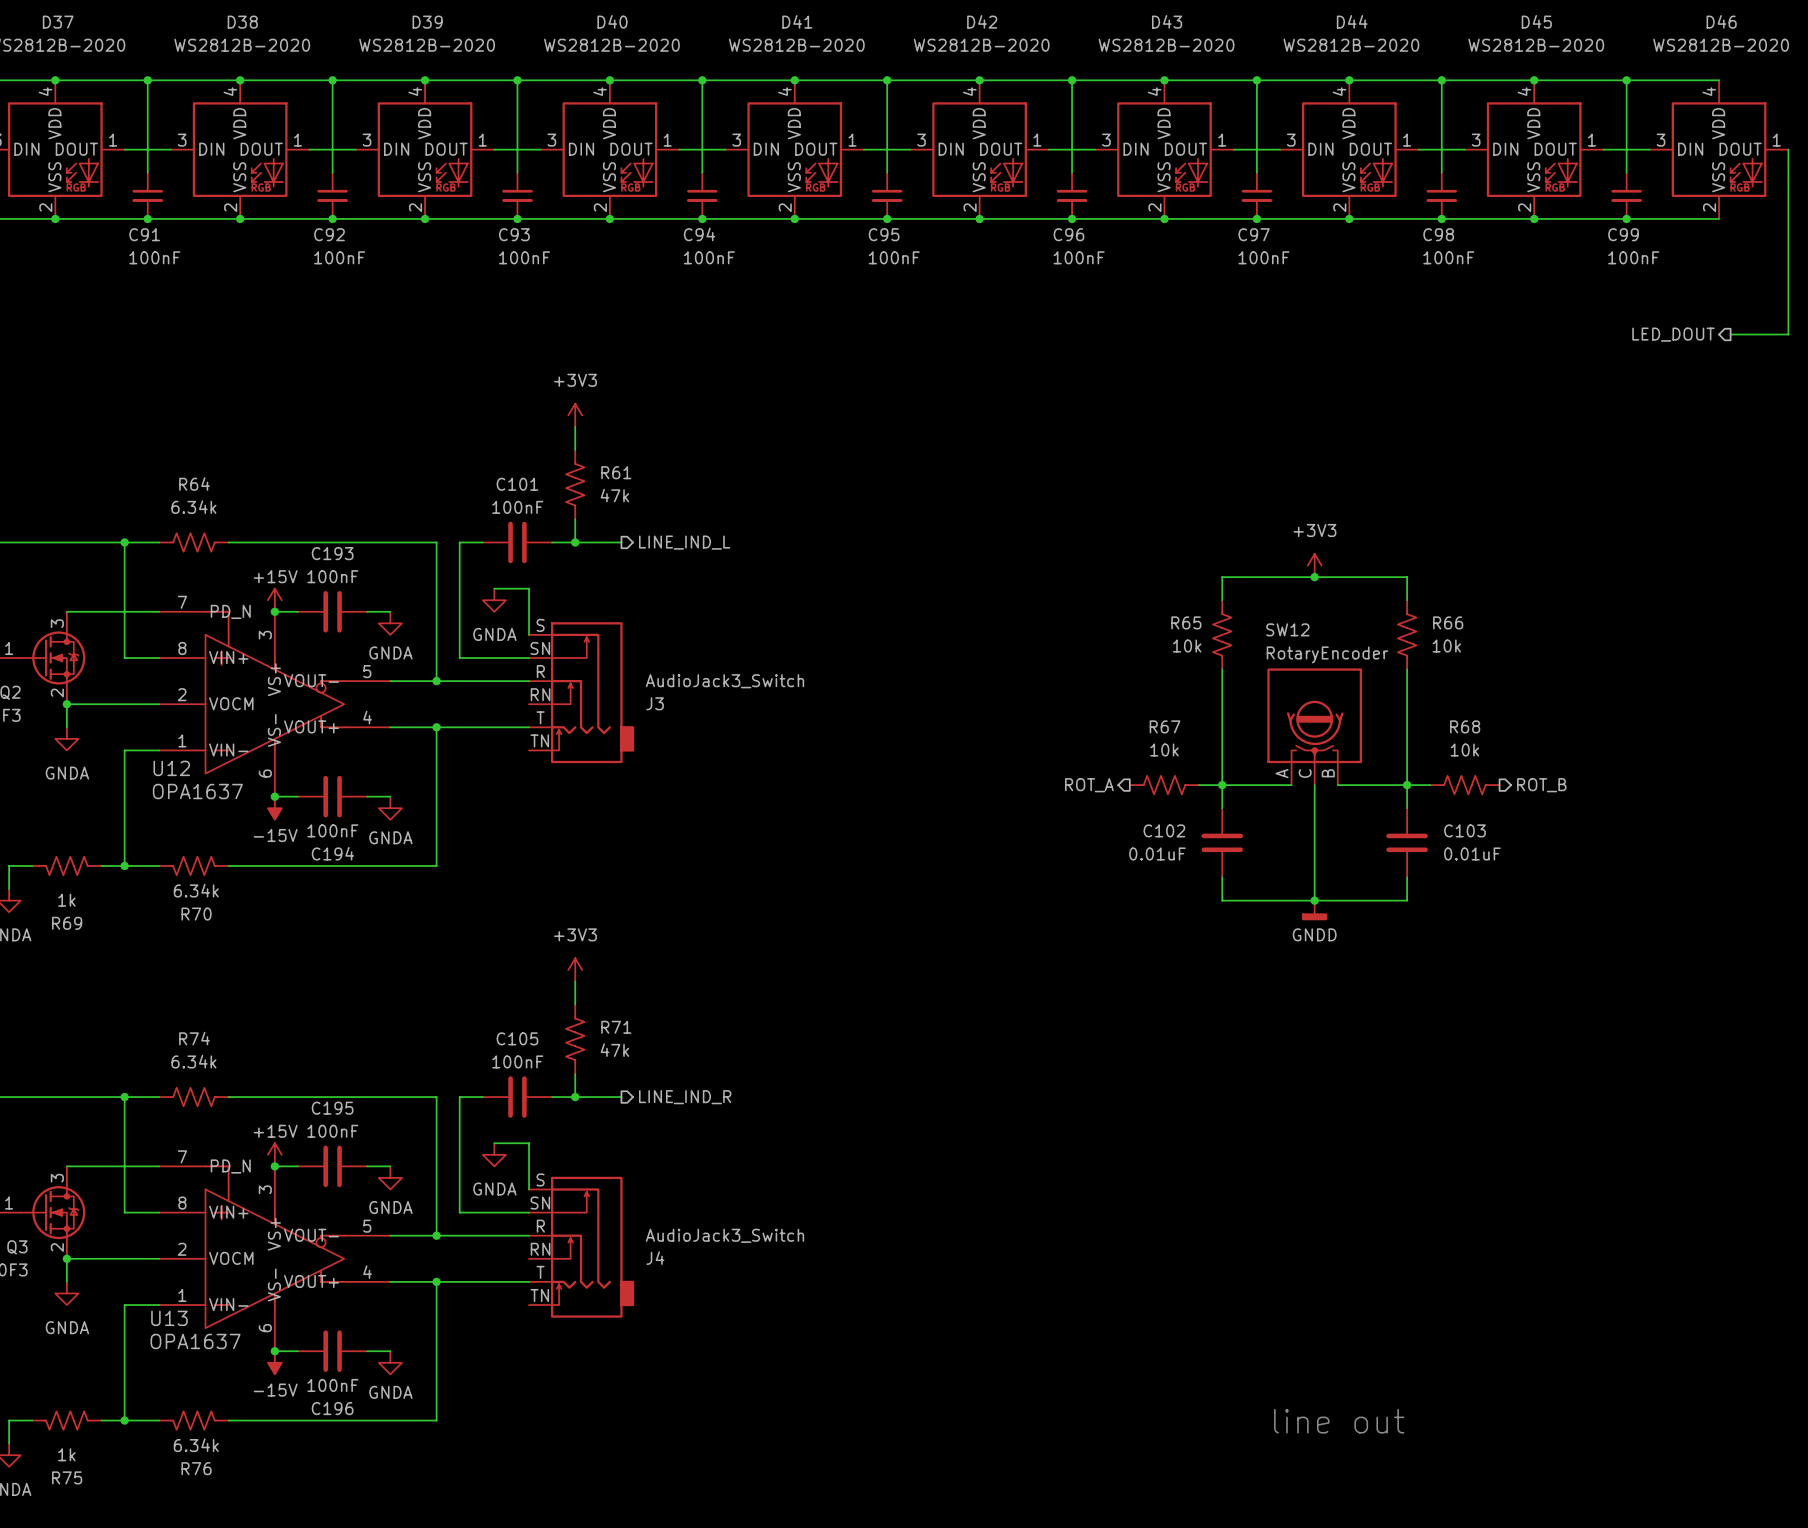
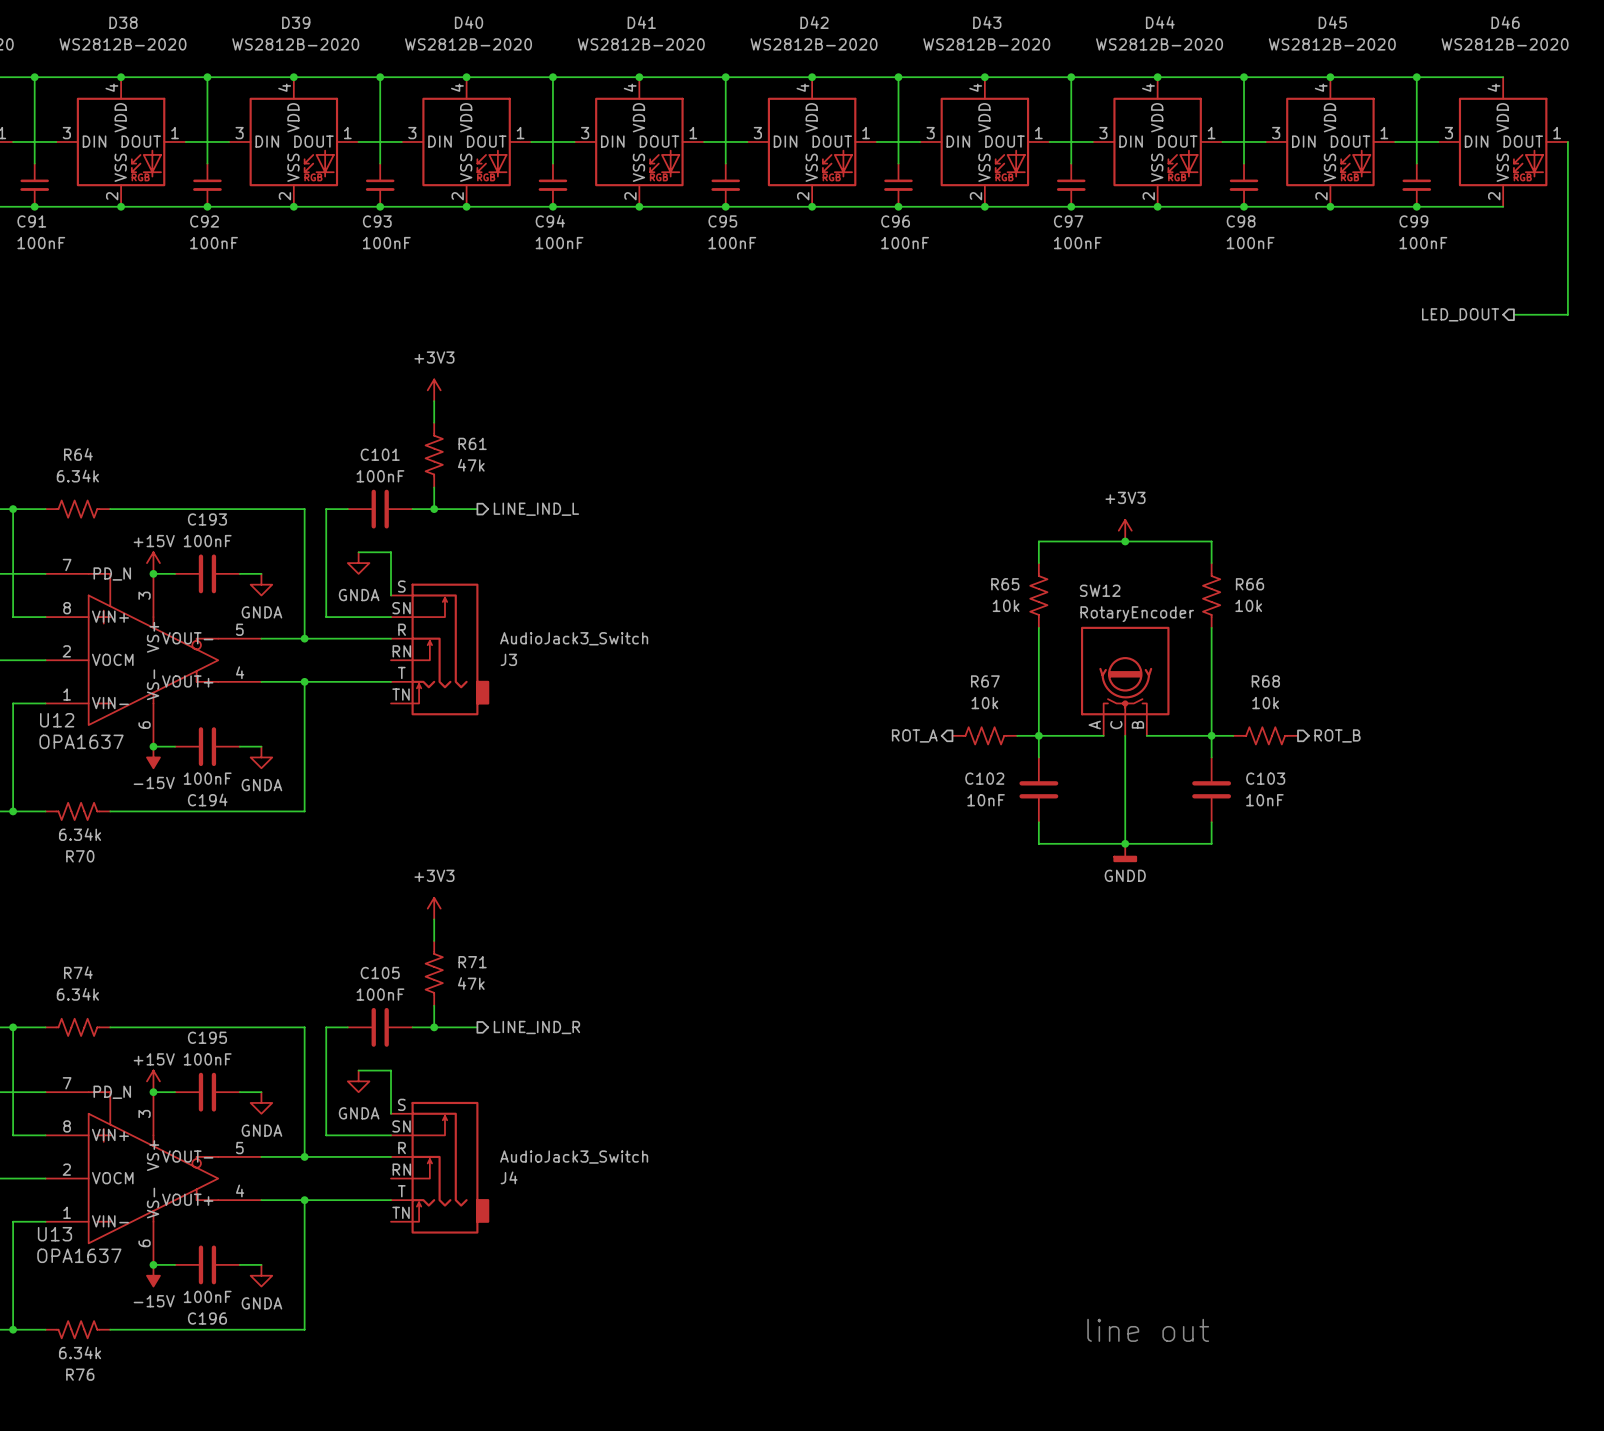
C102 value: 0.01uF (1157, 853) -> 10nF (986, 800)
C103 value: 0.01uF (1472, 853) -> 10nF (1264, 800)

